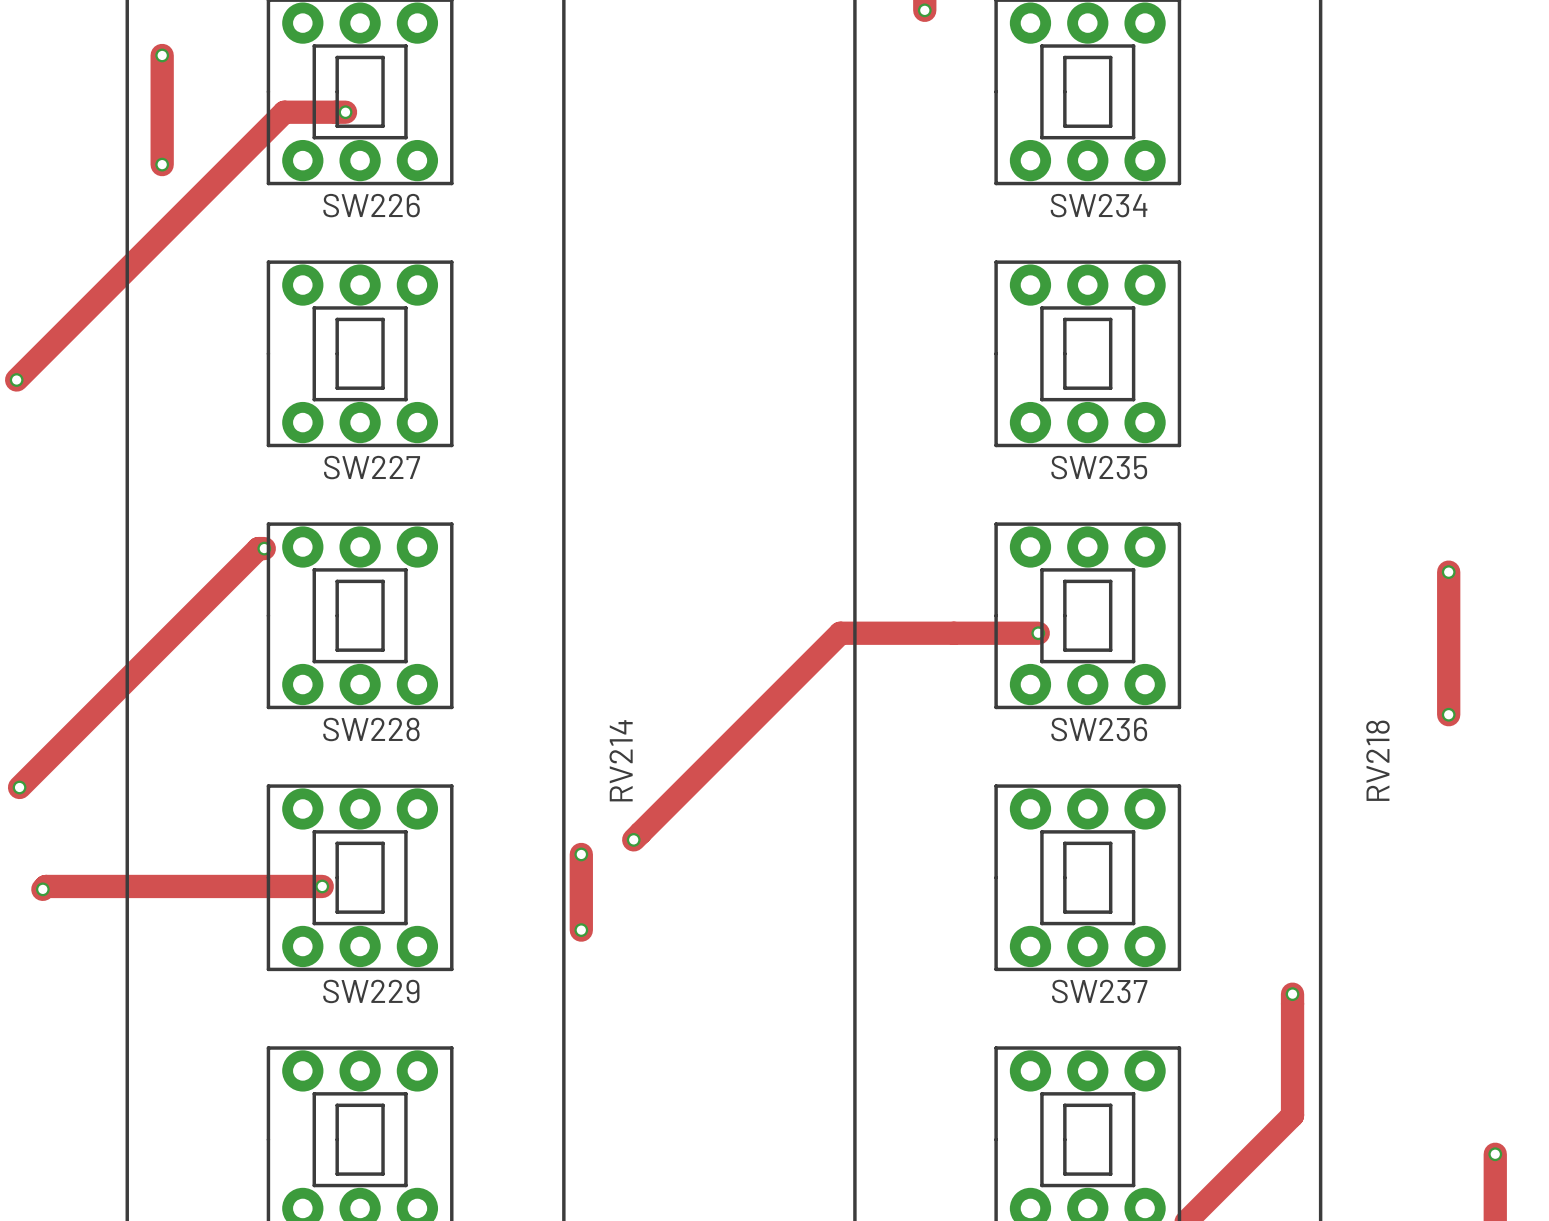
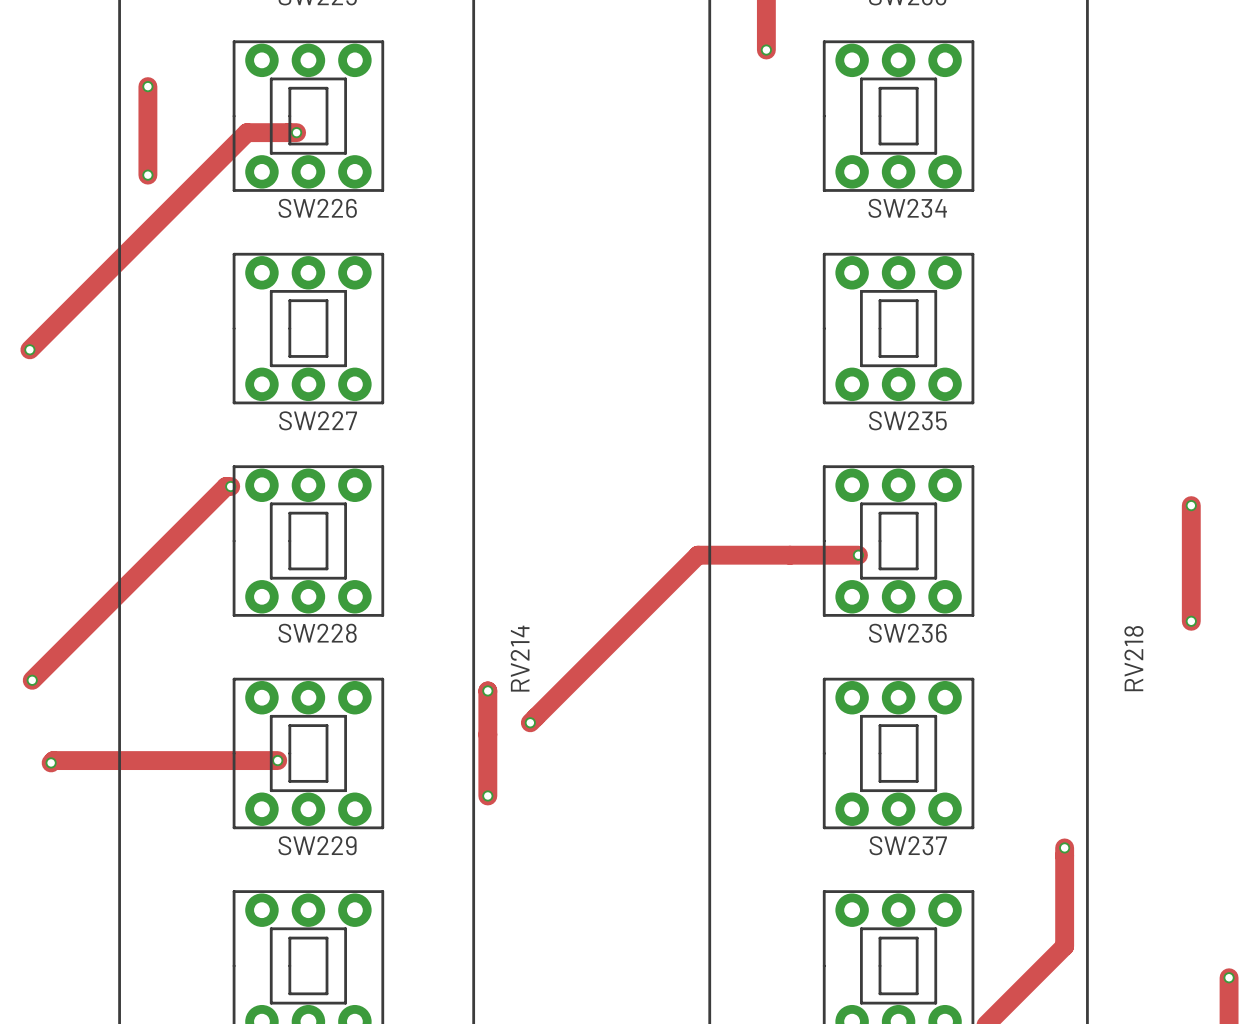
track: none -> (487, 690) (487, 734)
via position: (581, 854) -> (487, 690)

